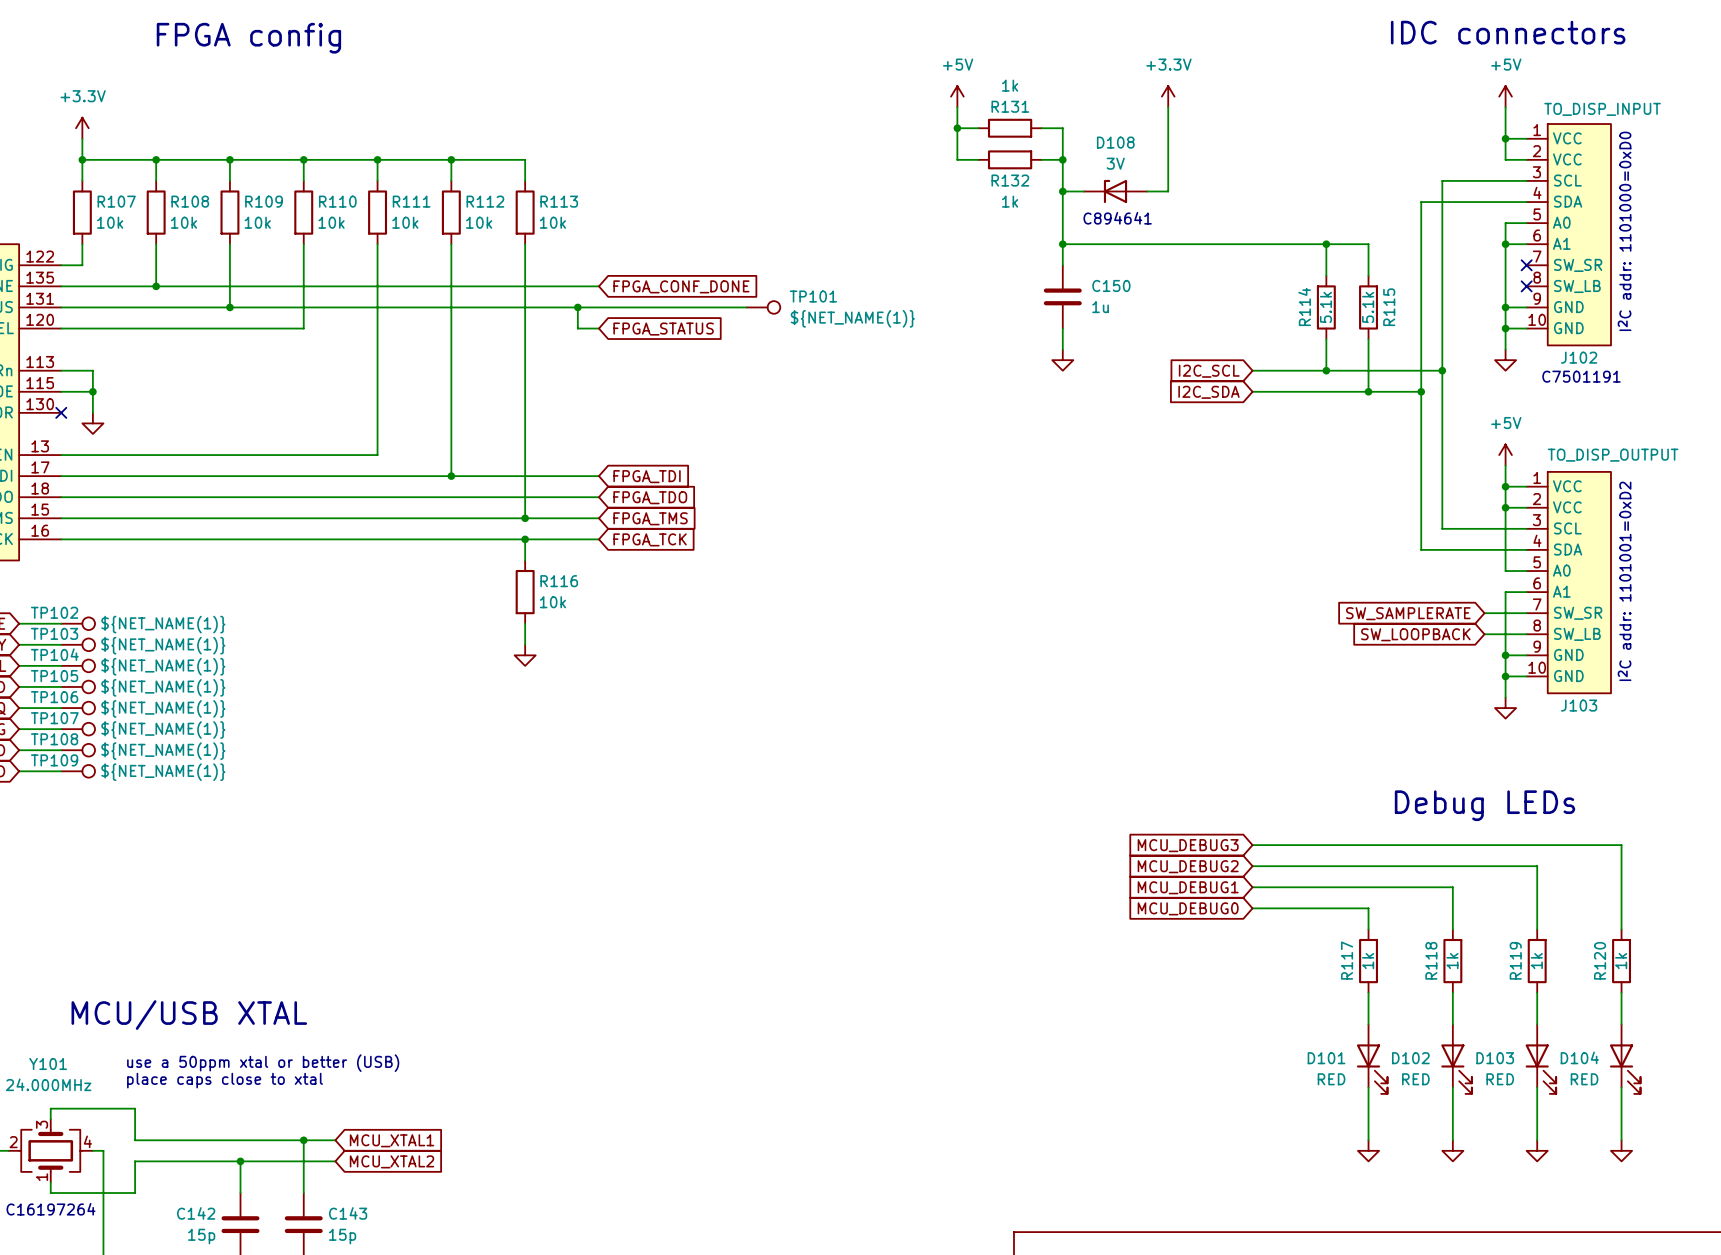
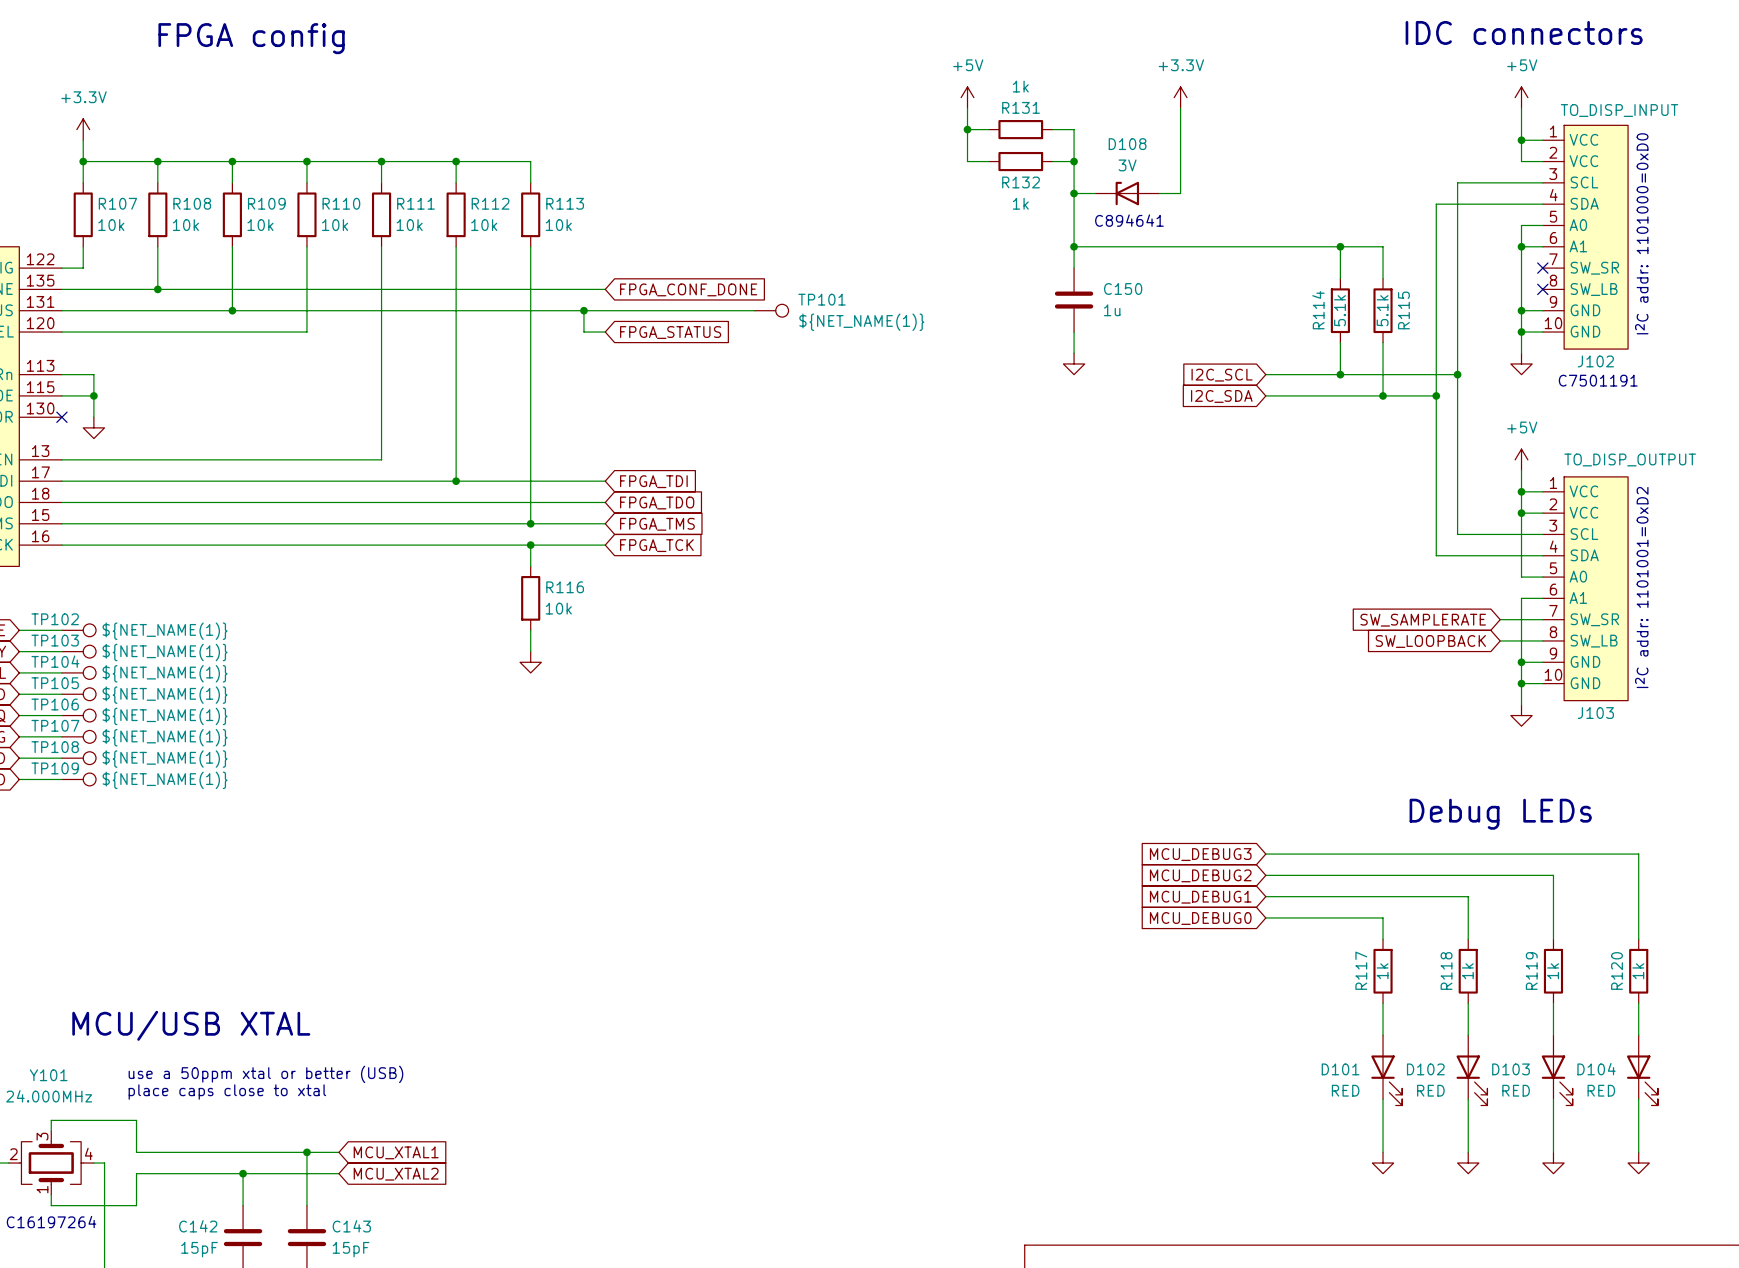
C142 value: 15p (201, 1236) -> 15pF (199, 1249)
C143 value: 15p (342, 1236) -> 15pF (351, 1249)

